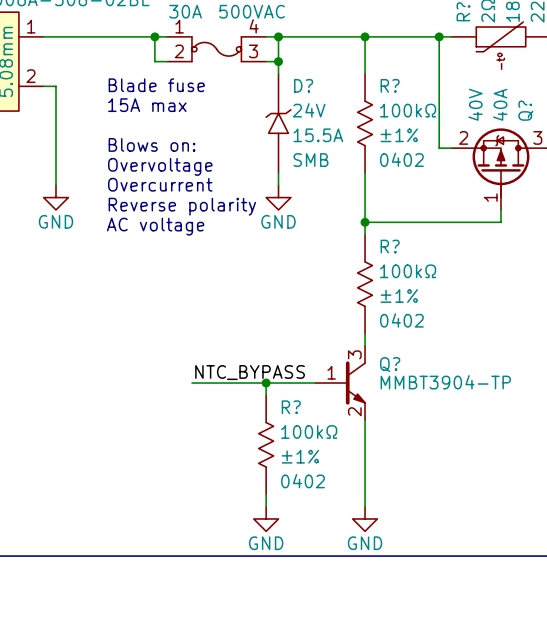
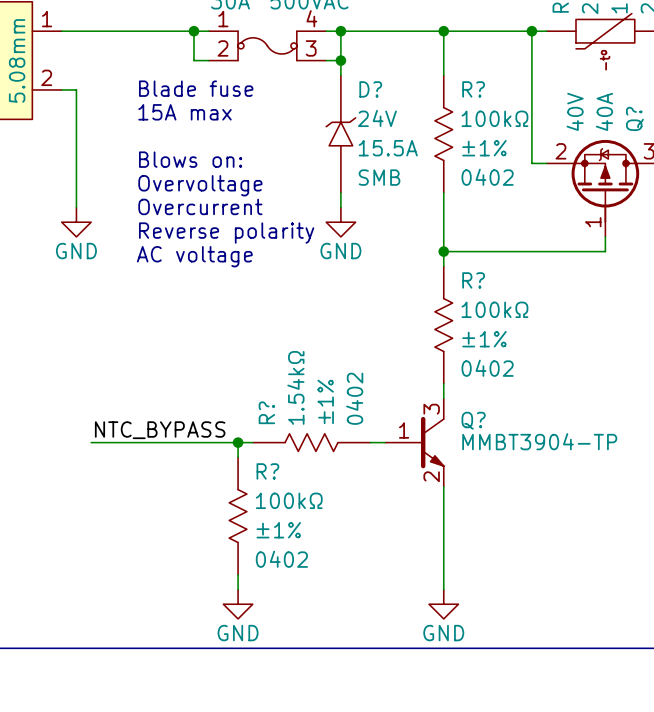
label position: NTC_BYPASS (250, 372) -> NTC_BYPASS (160, 430)
wire: none -> (91, 442) (238, 442) (238, 457)
junction: none -> (238, 442)
R?: none -> (311, 442)
wire: (266, 383) (266, 395) -> none
junction: (266, 383) -> none
R? position: (266, 444) -> (238, 516)
wire: (266, 494) (266, 506) -> (238, 574) (238, 589)
power symbol position: GND (266, 518) -> GND (238, 604)

